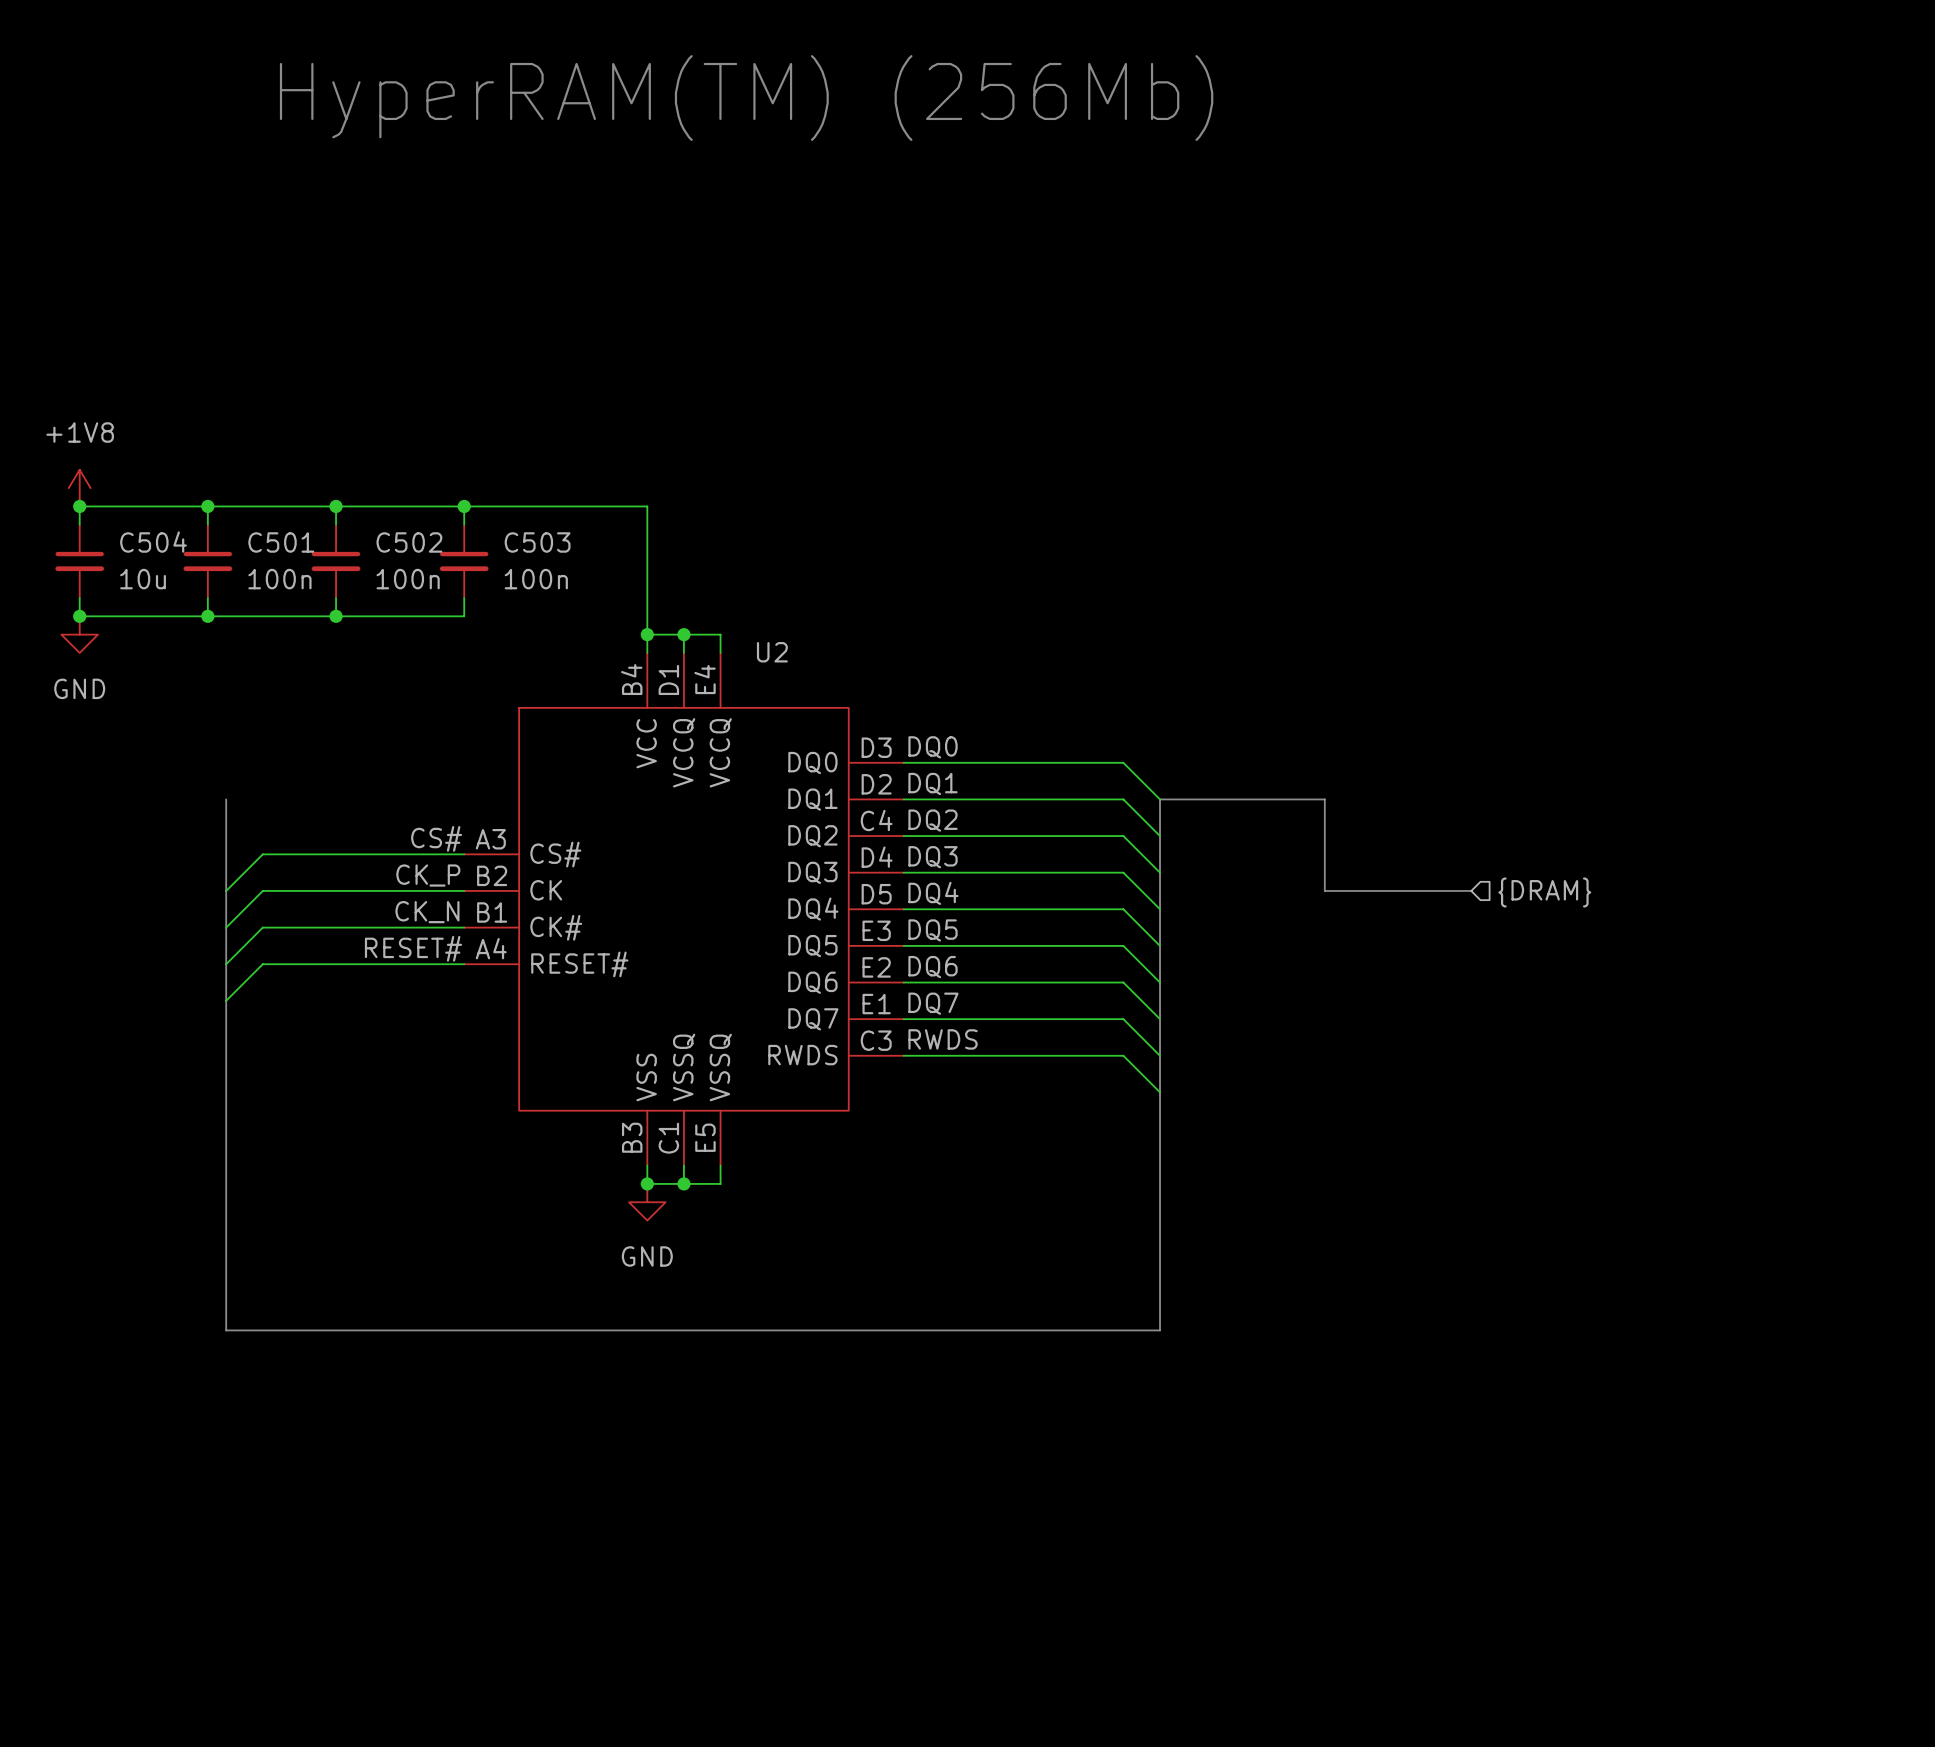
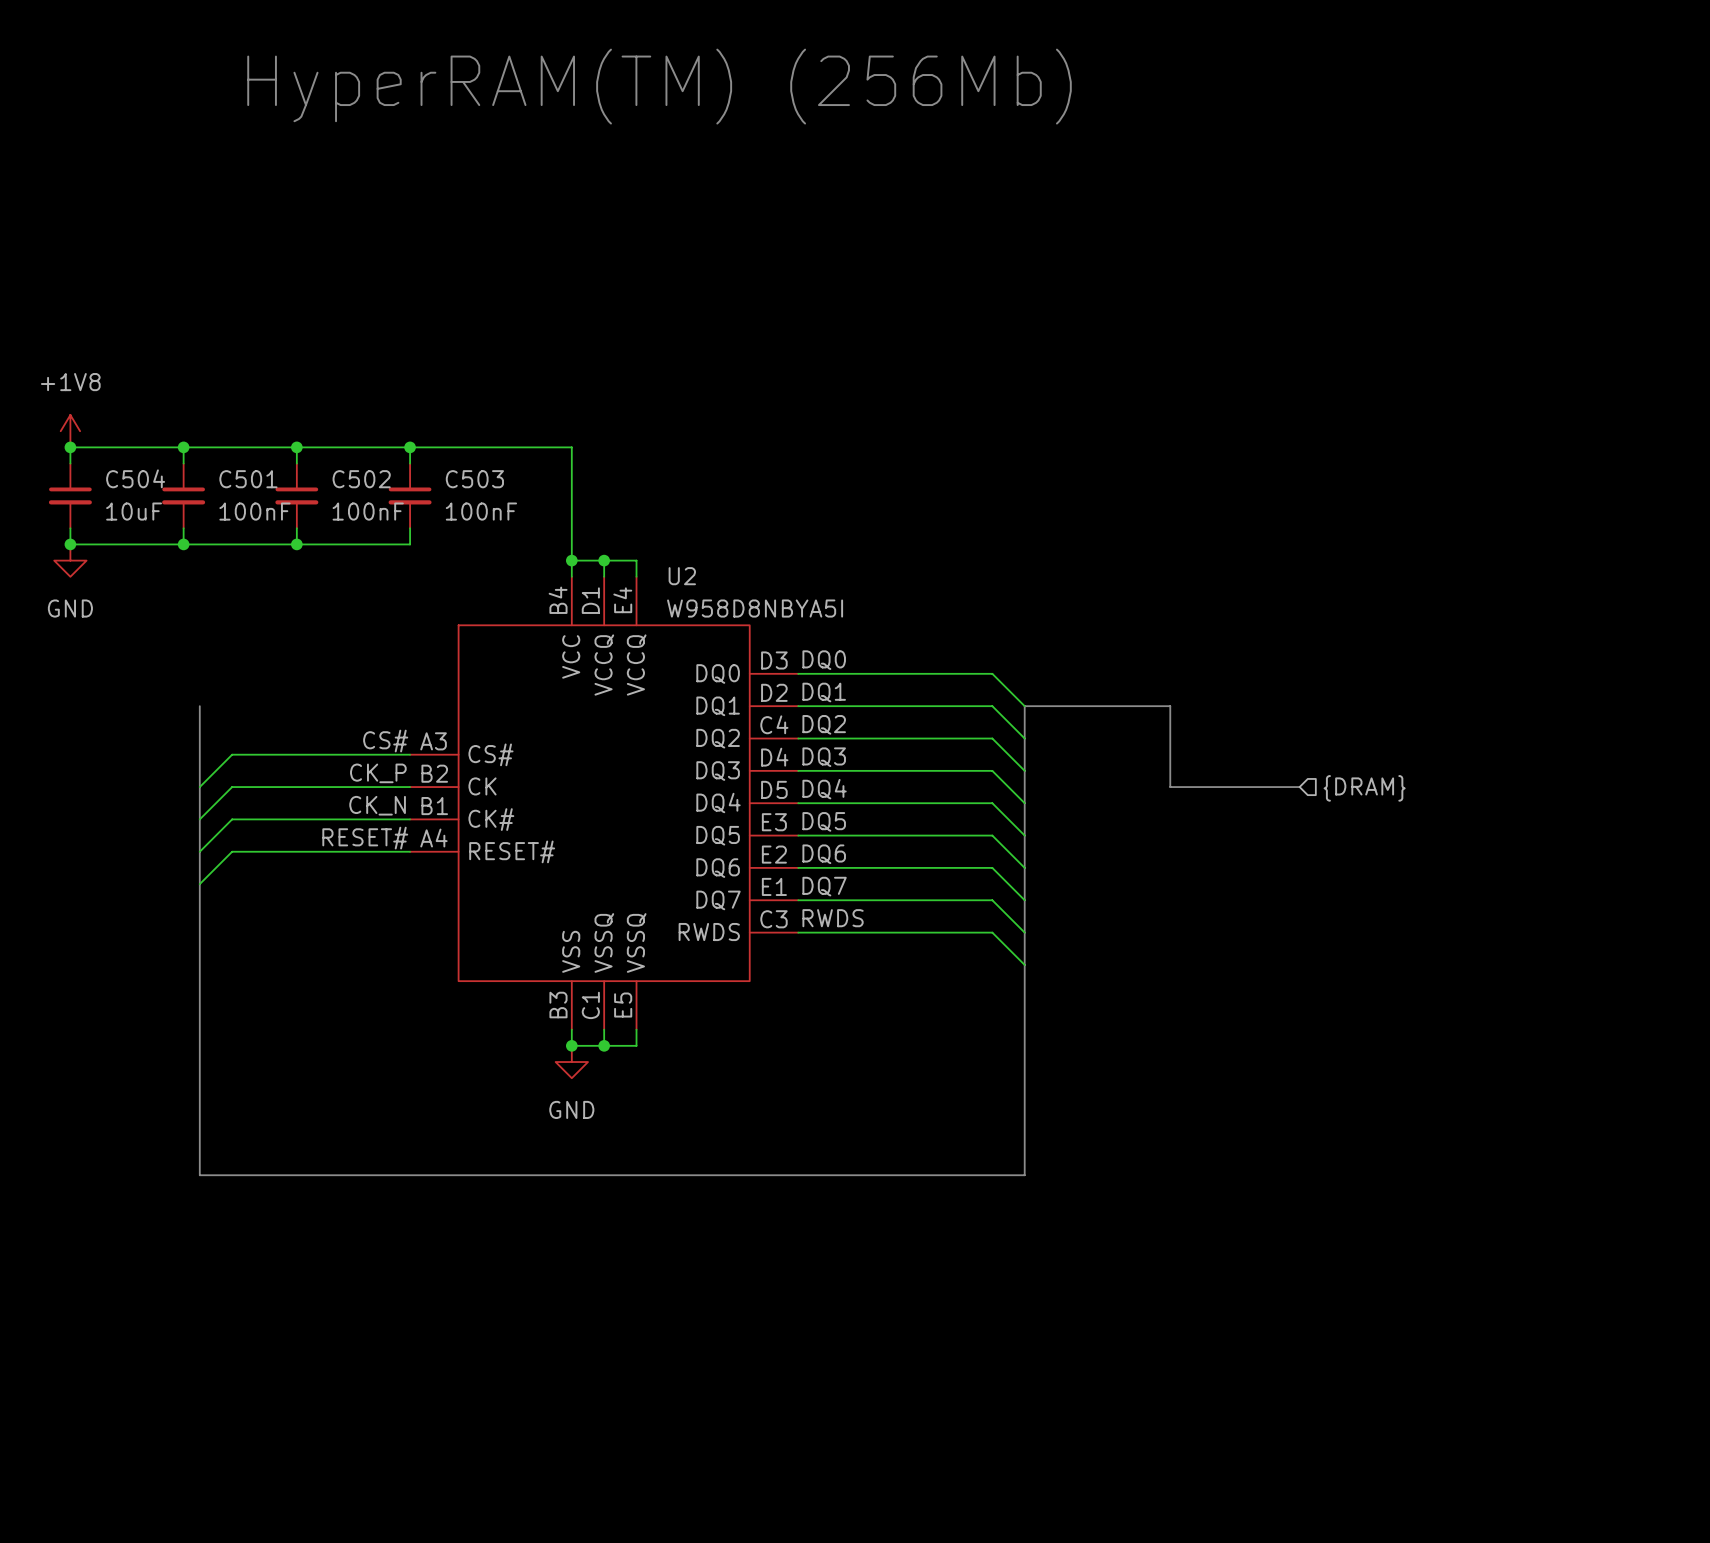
C504 value: 10u (143, 579) -> 10uF (134, 511)
C501 value: 100n (279, 579) -> 100nF (254, 511)
C502 value: 100n (408, 579) -> 100nF (368, 511)
C503 value: 100n (536, 579) -> 100nF (481, 511)
U2 value: none -> W958D8NBYA5I (755, 608)

